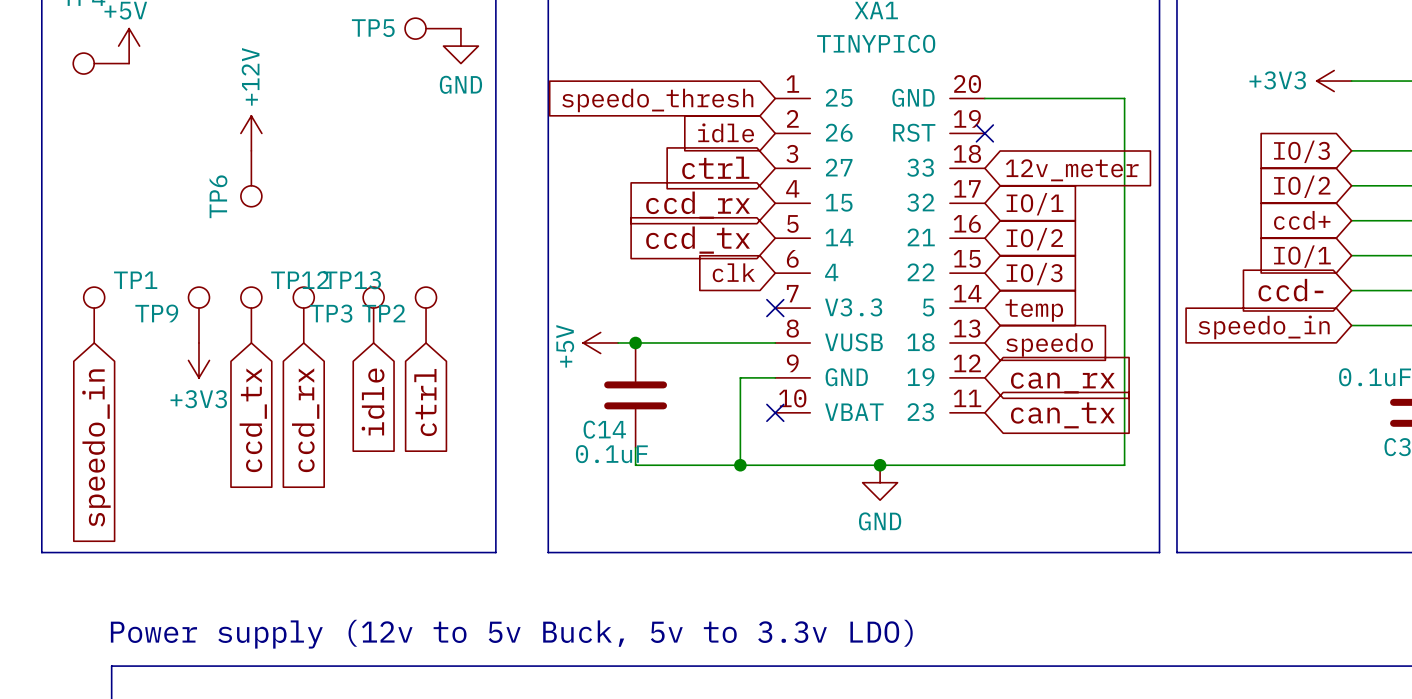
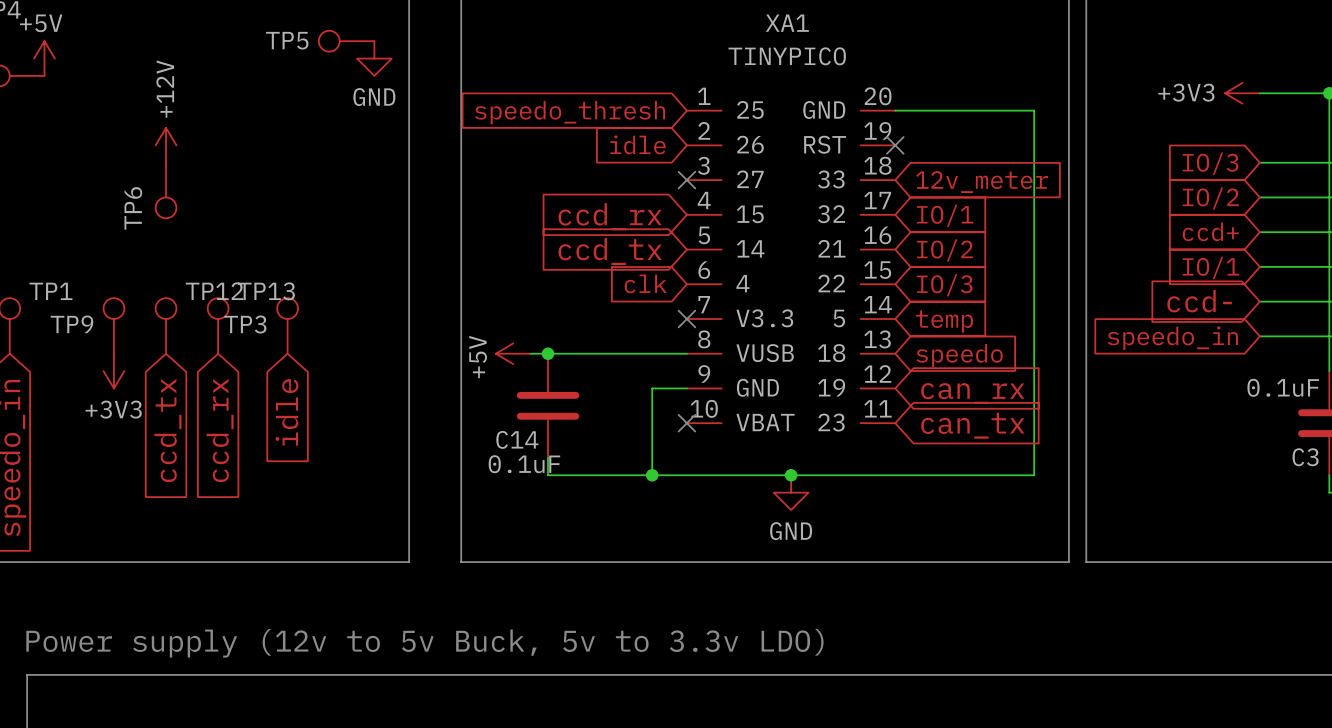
global label: ctrl (715, 167) -> none
no-connect mark: none -> (686, 180)
TP2: (426, 315) -> none
global label: ctrl (425, 402) -> none

